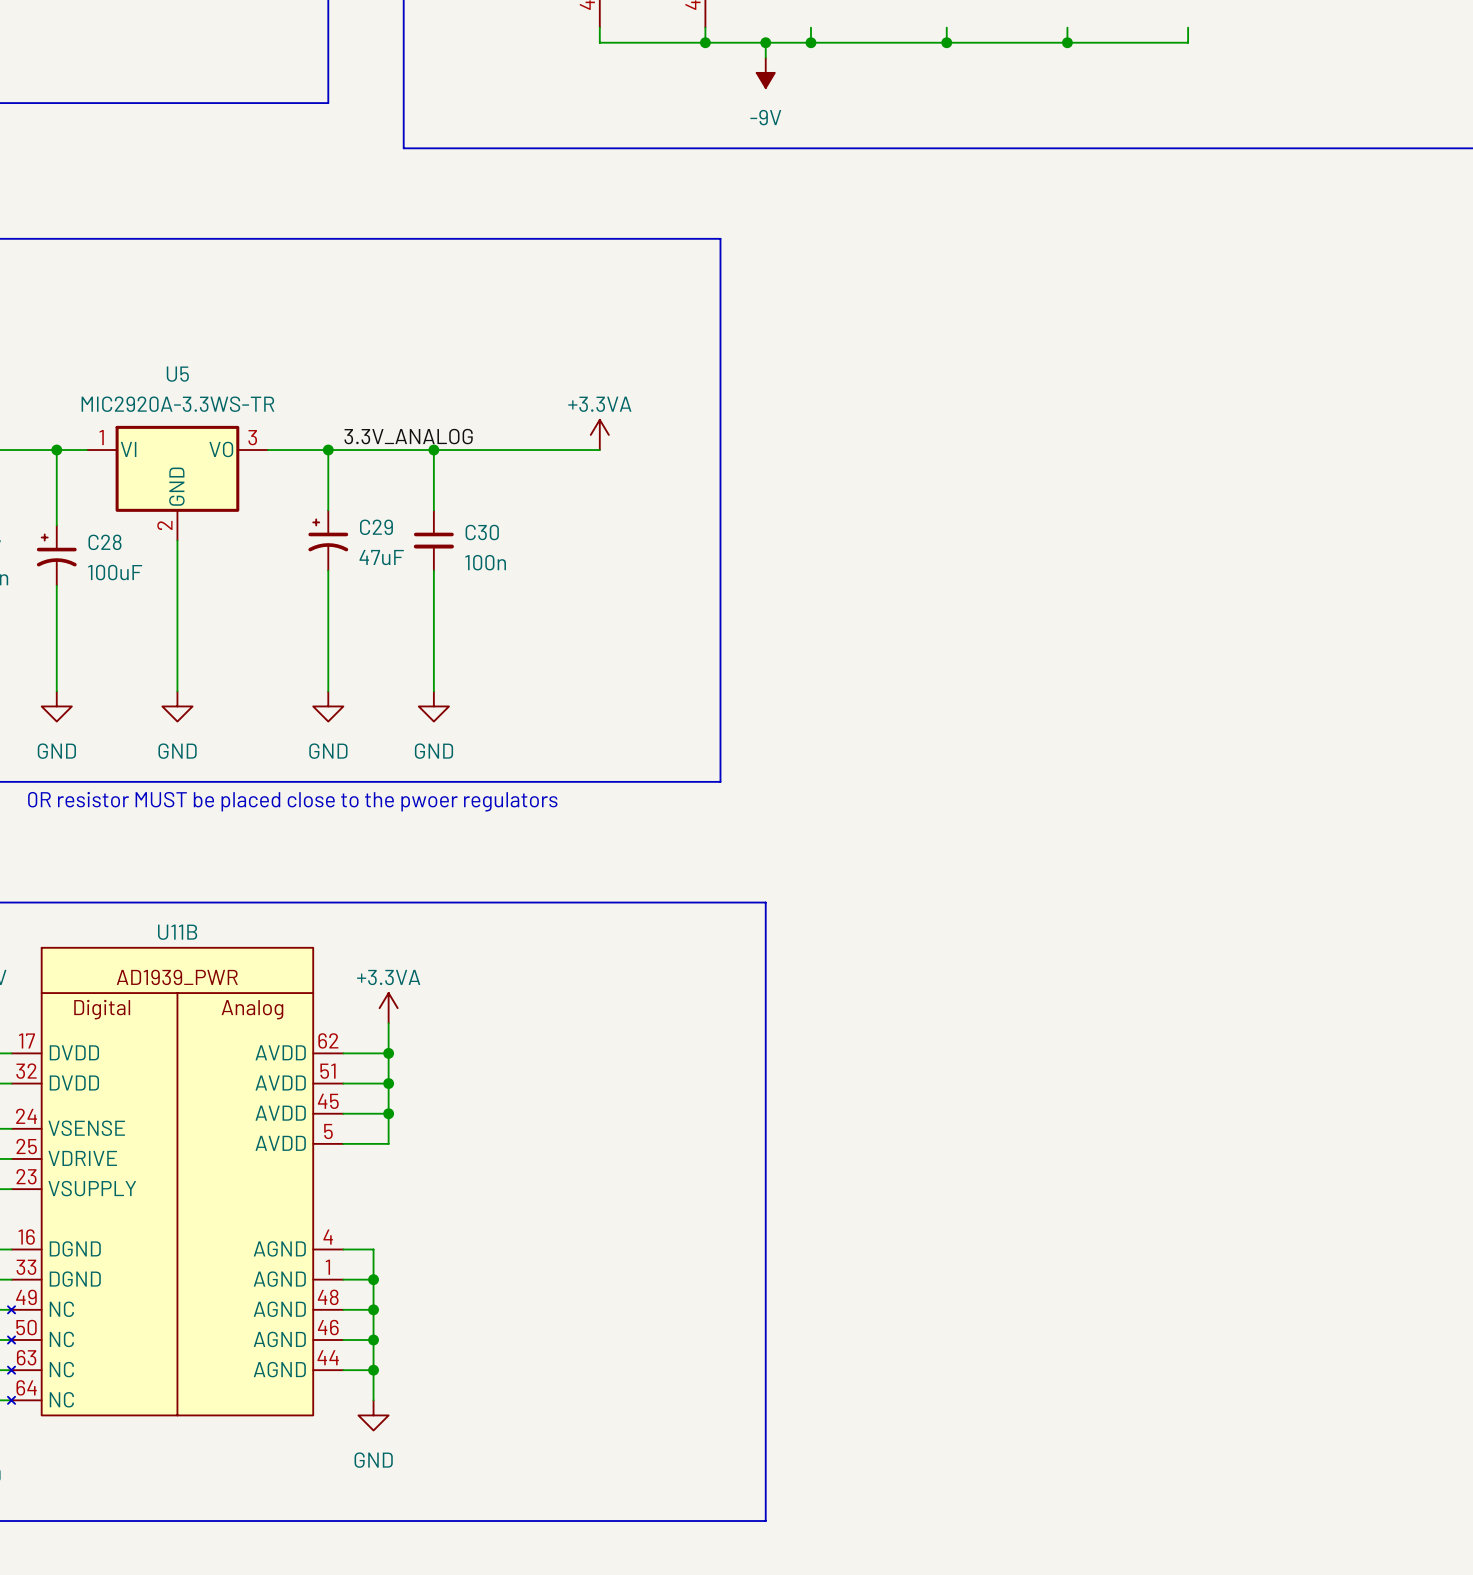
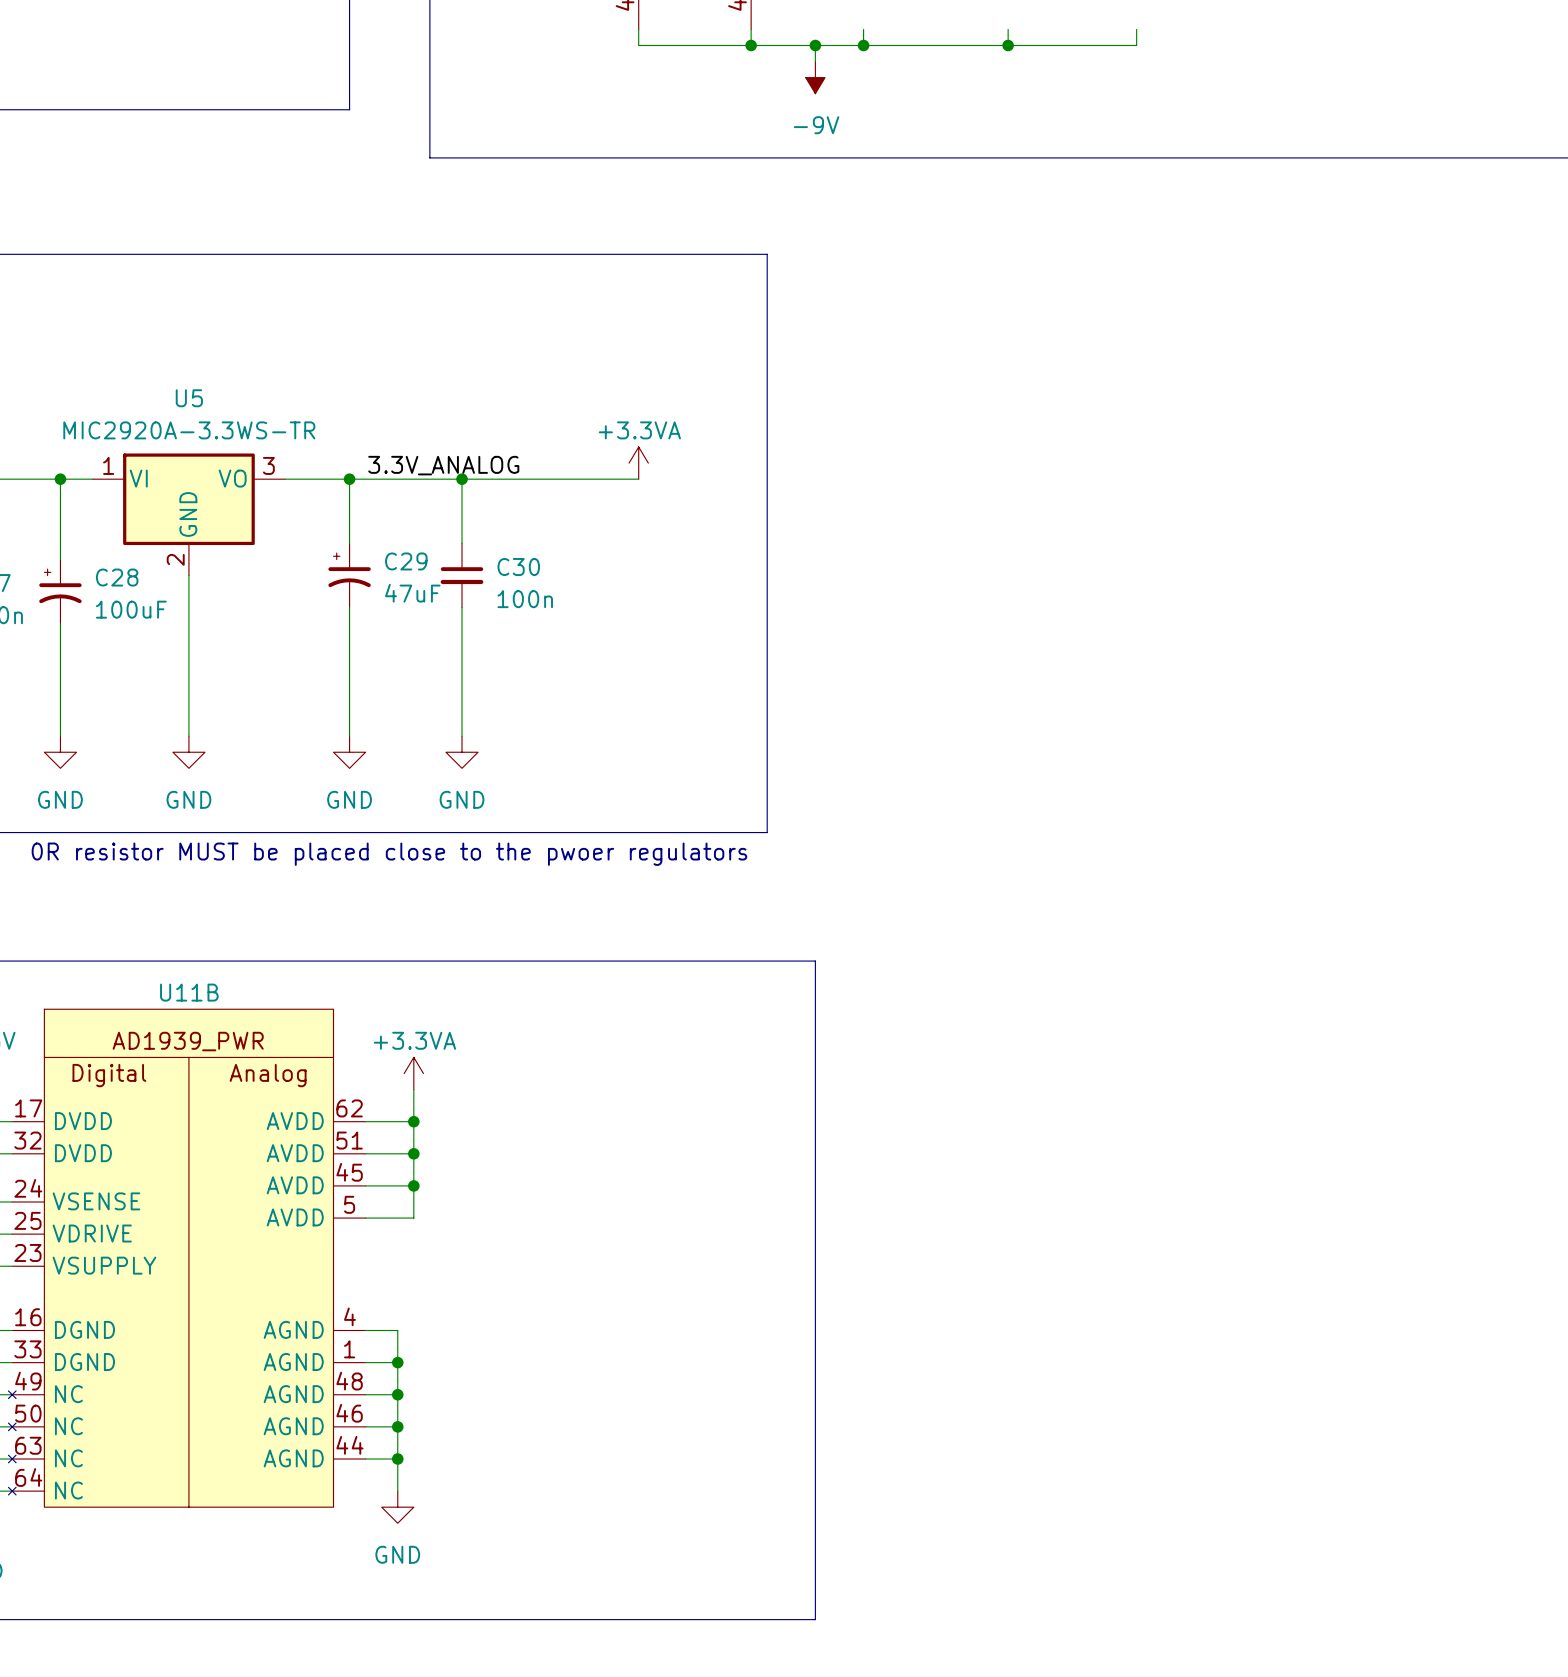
wire: (1188, 27) (1188, 42) (1067, 42) -> none
junction: (1067, 42) -> none

